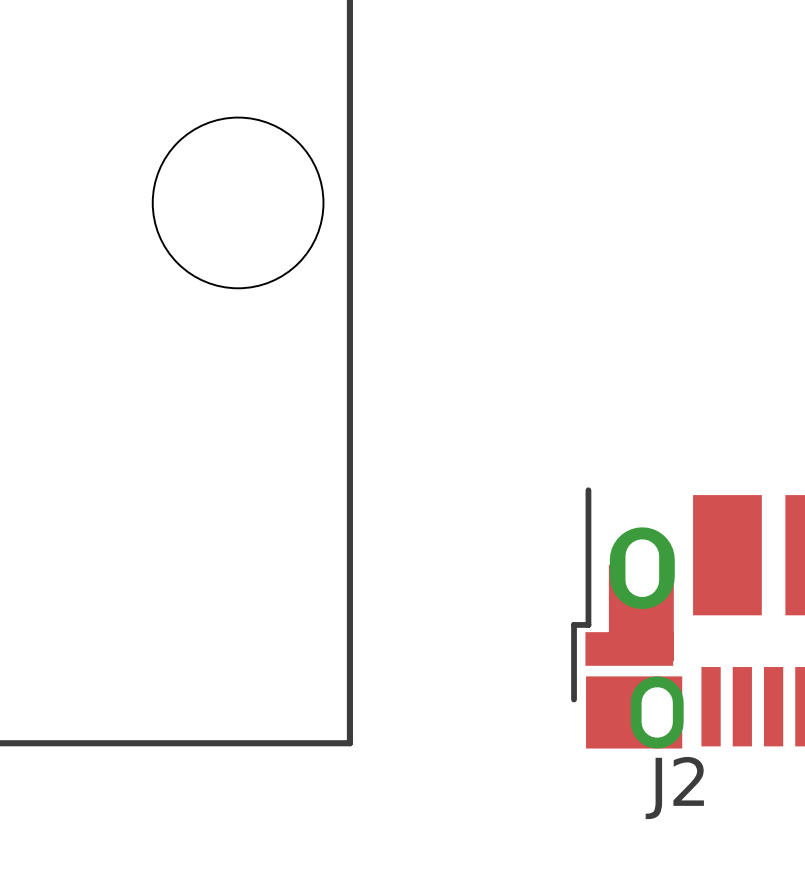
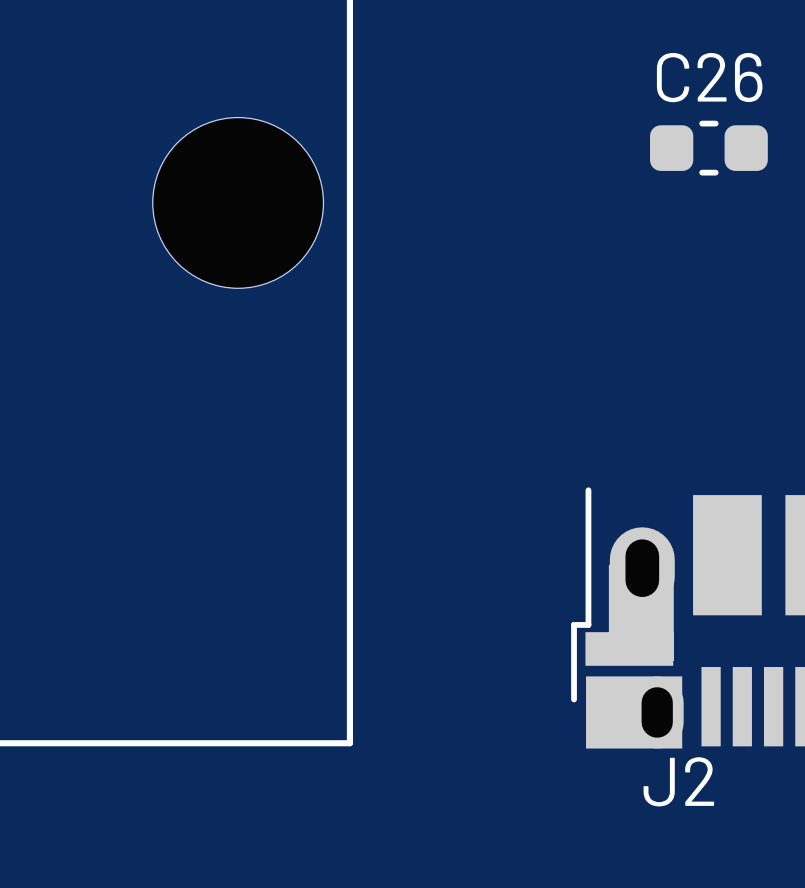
C26: none -> (708, 148)

